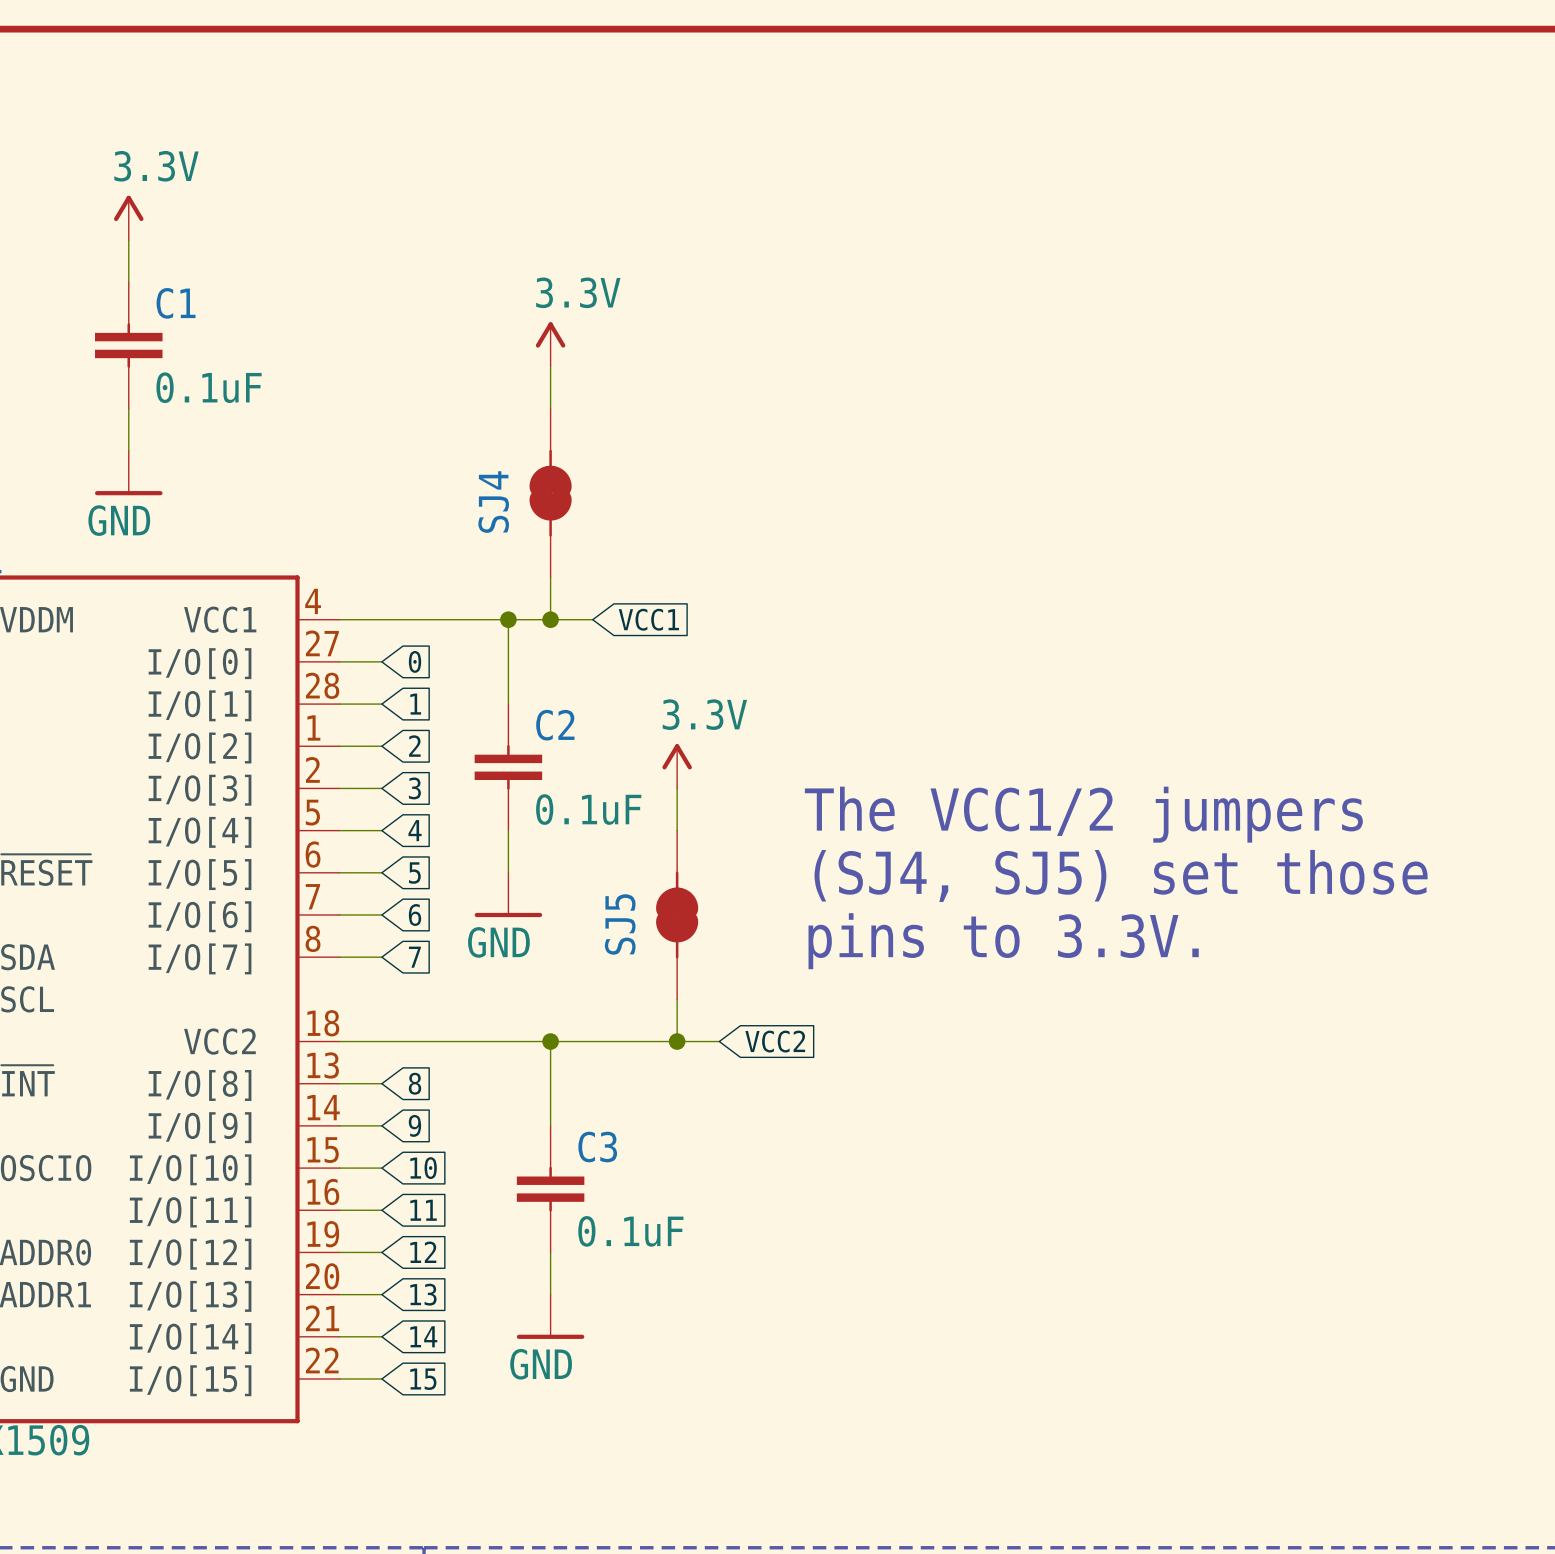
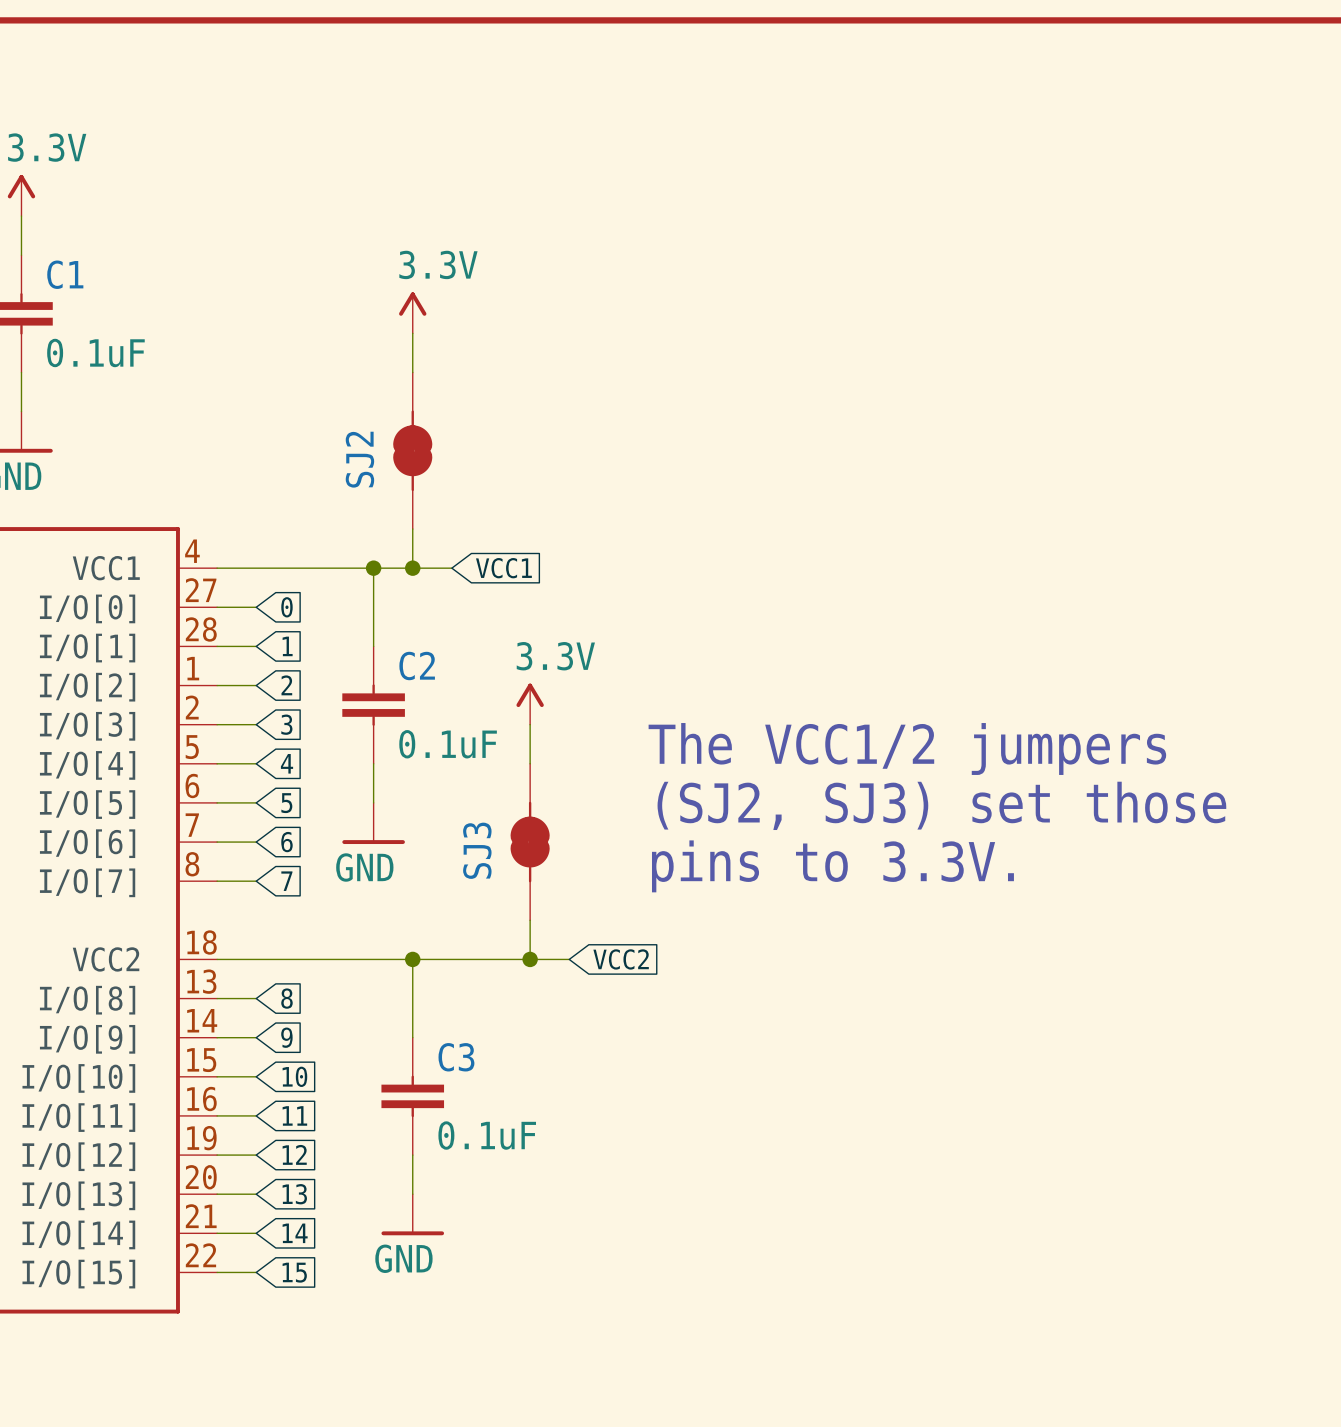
SJ4 name: SJ4 (493, 502) -> SJ2 (359, 459)
text: (SJ4, SJ5) set those (1121, 875) -> (SJ2, SJ3) set those (941, 805)
SJ5 name: SJ5 (620, 924) -> SJ3 (477, 850)

